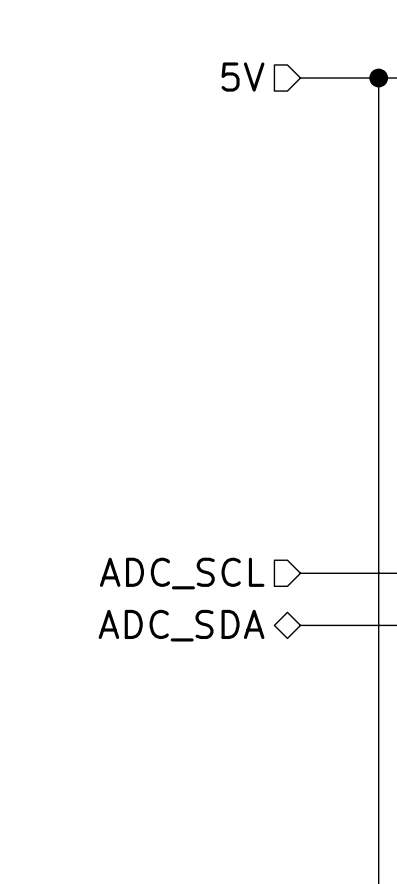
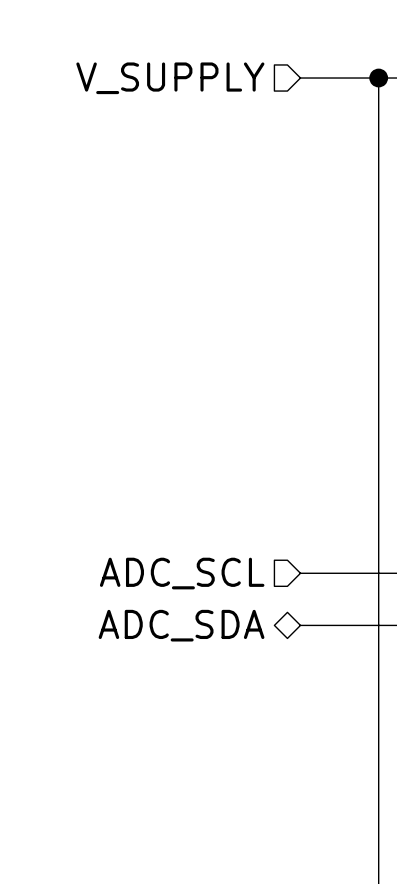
hierarchical label: 5V (242, 77) -> V_SUPPLY (170, 78)

